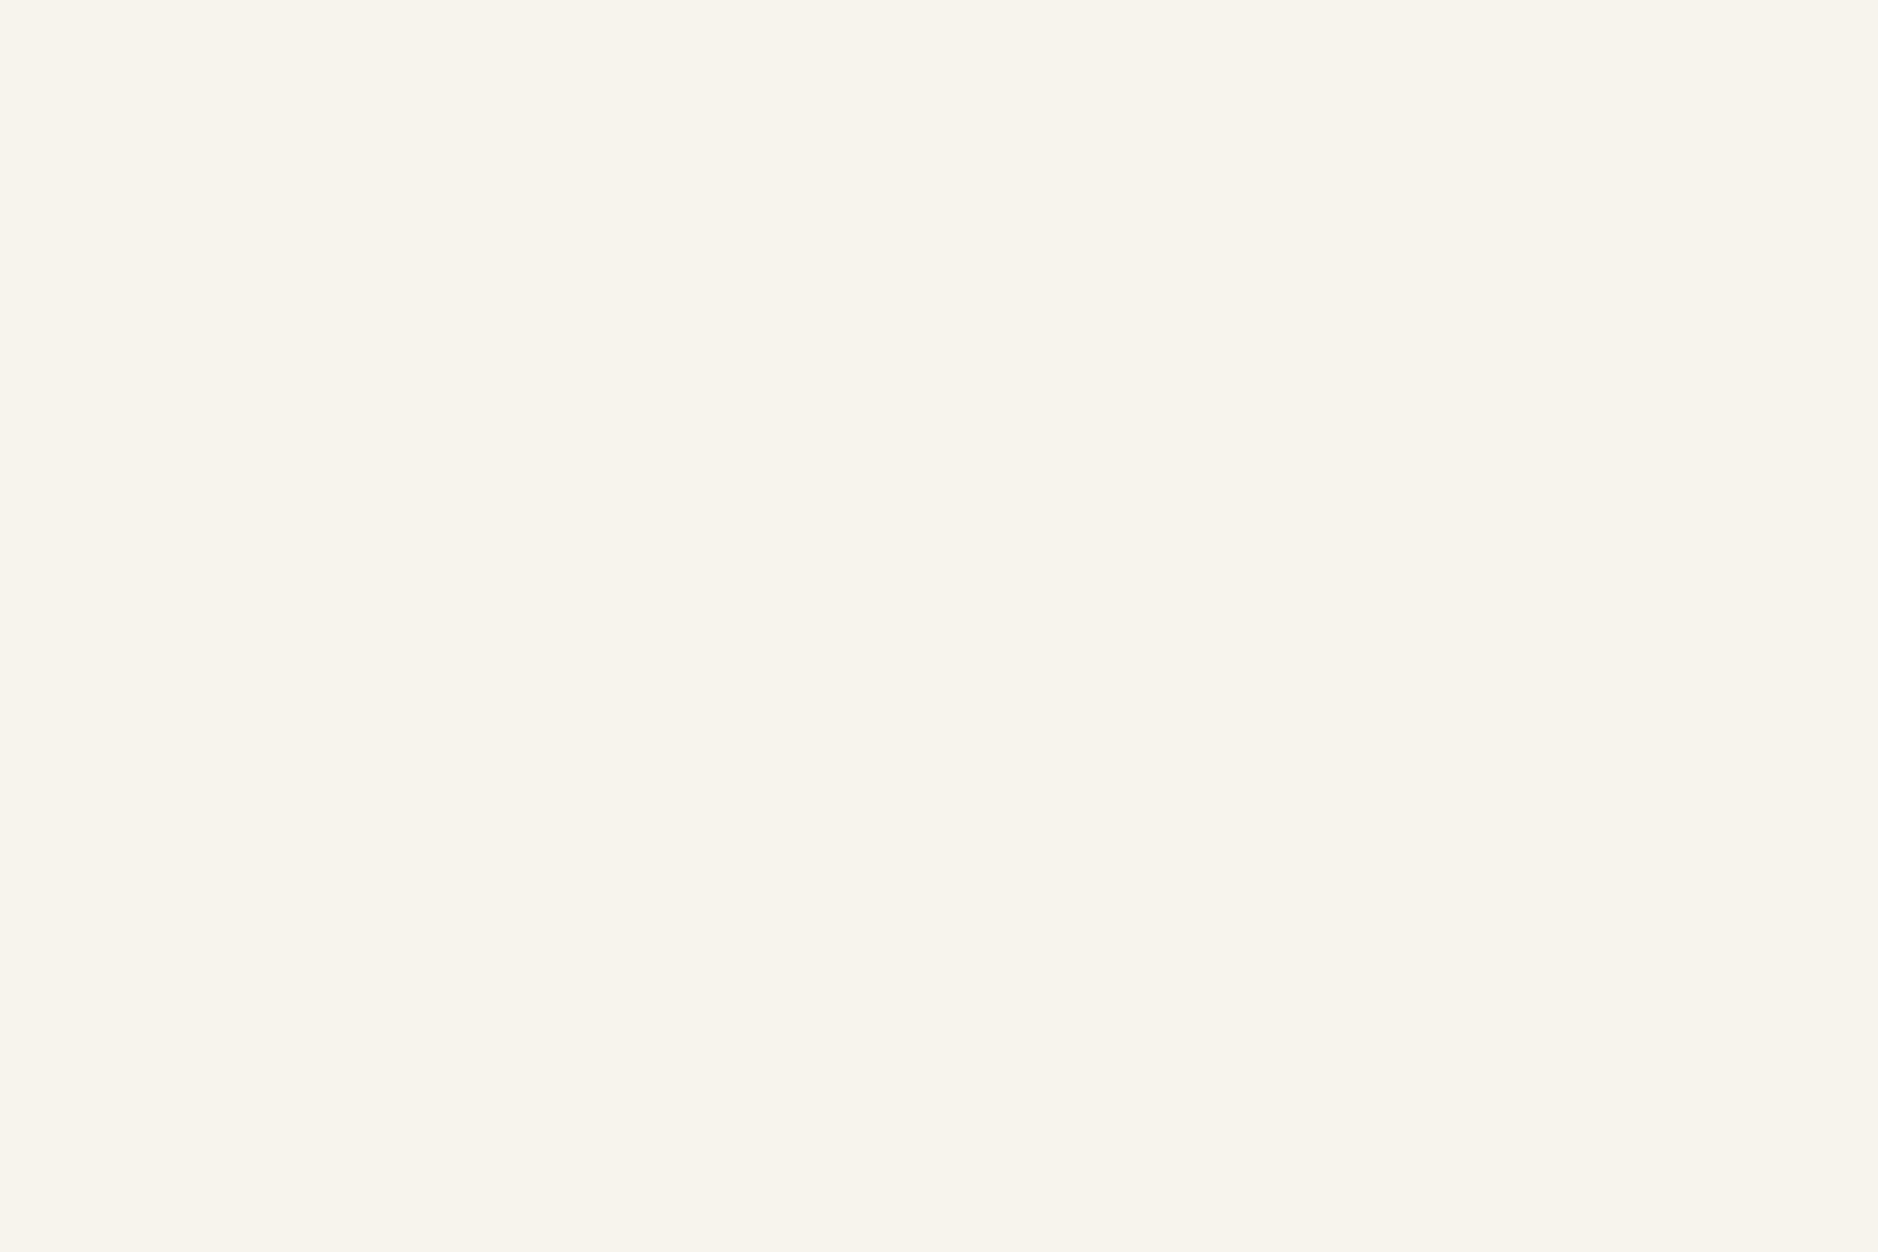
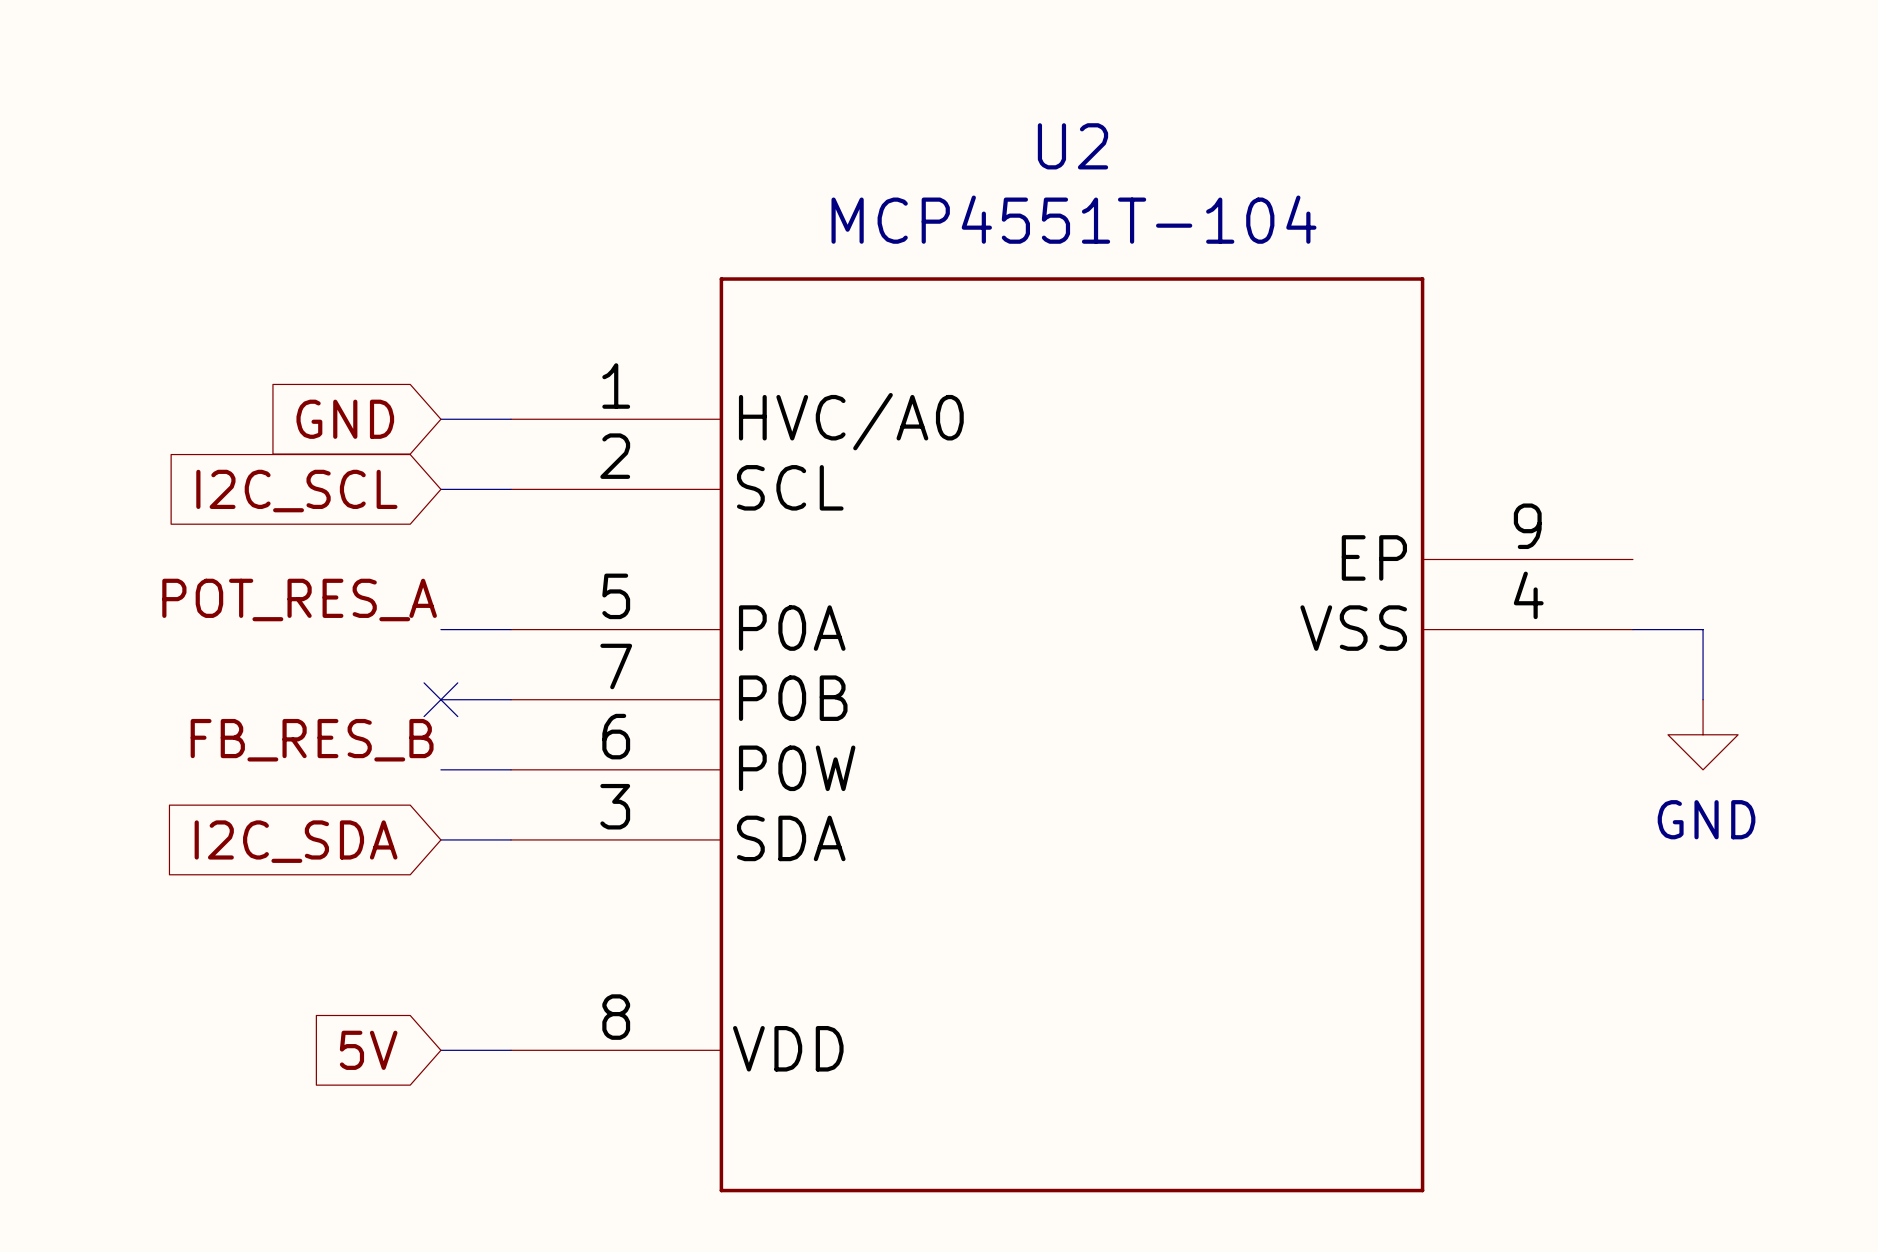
global label: none -> GND (345, 419)
wire: none -> (440, 419) (511, 419)
wire: none -> (440, 489) (511, 489)
global label: none -> I2C_SCL (296, 491)
label: none -> POT_RES_A (299, 599)
wire: none -> (440, 629) (511, 629)
wire: none -> (1632, 629) (1703, 629) (1703, 699)
wire: none -> (440, 699) (511, 699)
no-connect mark: none -> (440, 699)
U2: none -> MCP4551T-104 (1071, 734)
power symbol: none -> GND (1703, 734)
label: none -> FB_RES_B (312, 740)
wire: none -> (440, 769) (511, 769)
wire: none -> (440, 839) (511, 839)
global label: none -> I2C_SDA (296, 841)
global label: none -> 5V (368, 1050)
wire: none -> (440, 1050) (511, 1050)

